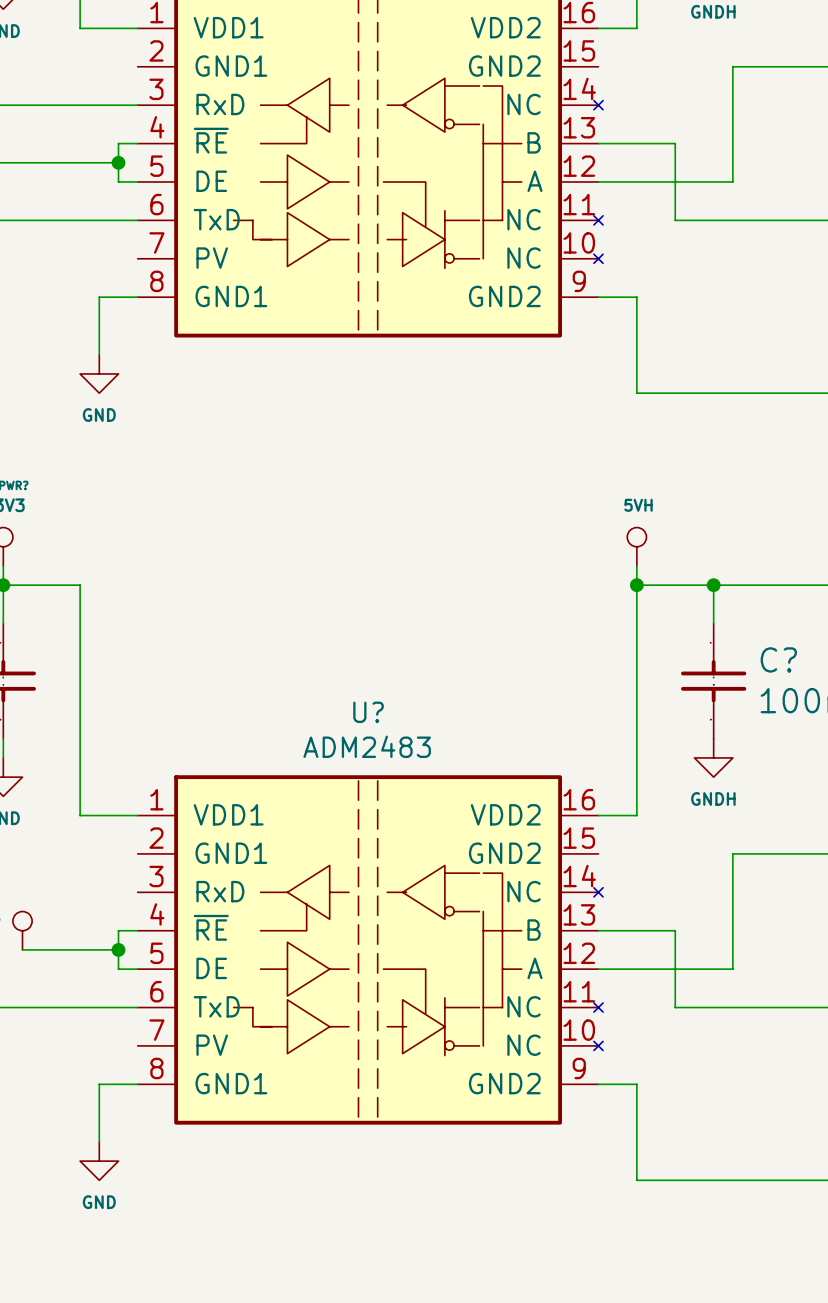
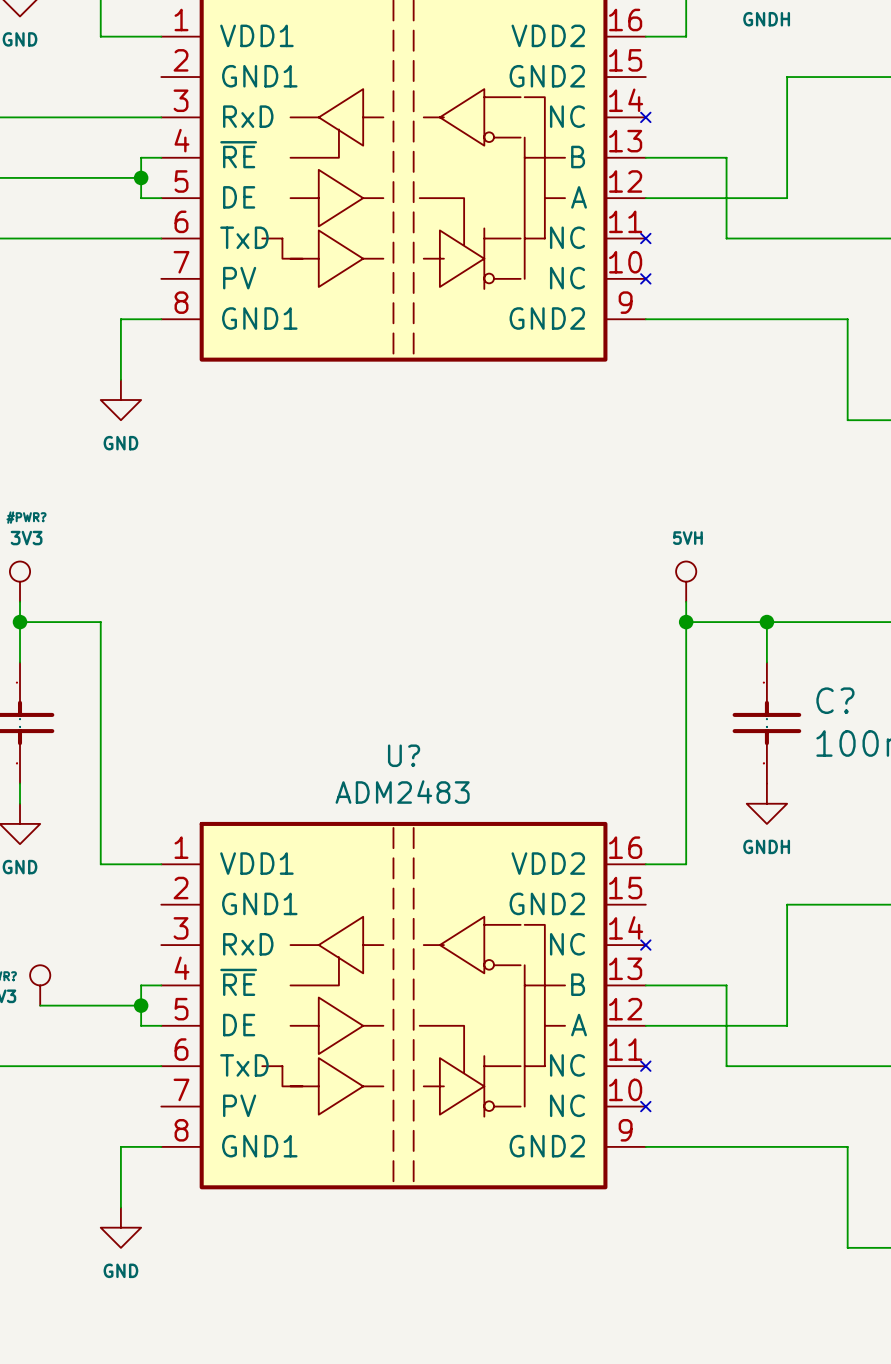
wire: (636, 297) (636, 393) (790, 393) -> (686, 319) (847, 319) (847, 420)
wire: (636, 1084) (636, 1180) (790, 1180) -> (686, 1146) (847, 1146) (847, 1247)

